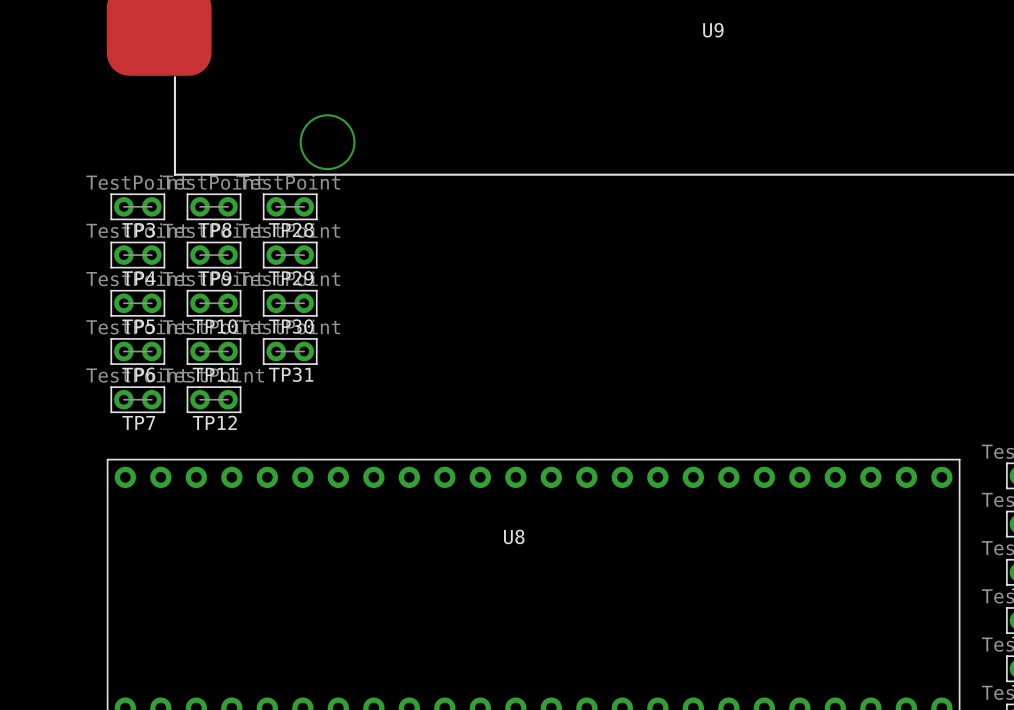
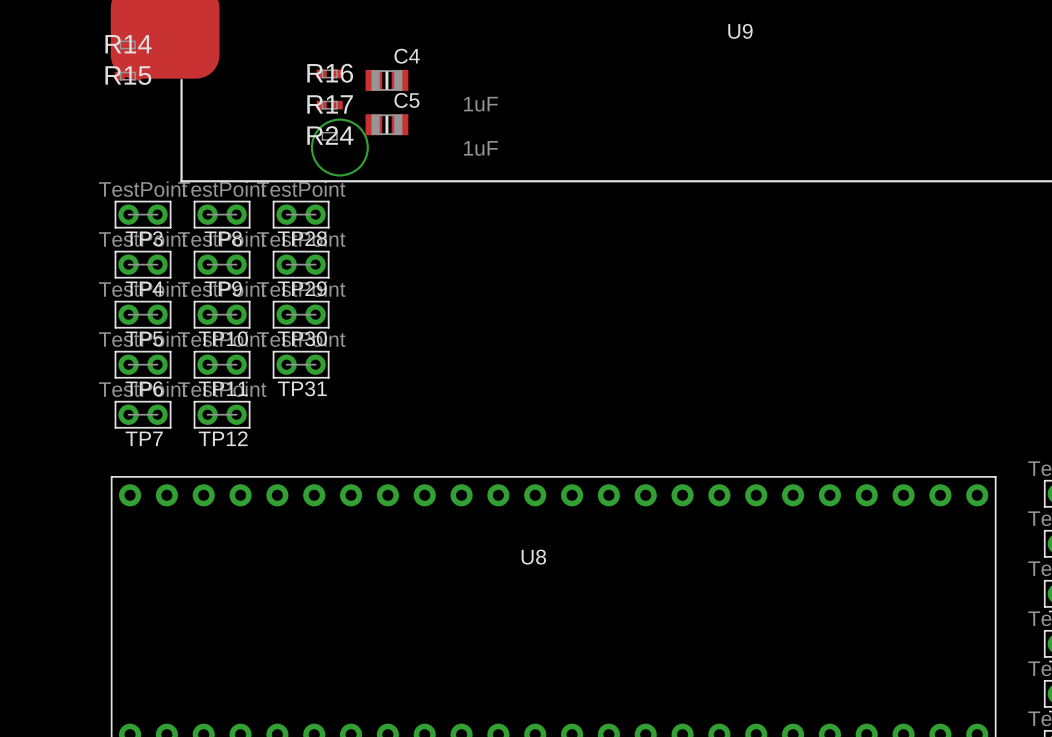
R14: none -> (127, 44)
R16: none -> (329, 73)
R15: none -> (127, 76)
C4: none -> 1uF (386, 80)
R17: none -> (329, 105)
C5: none -> 1uF (386, 124)
R24: none -> (329, 136)

